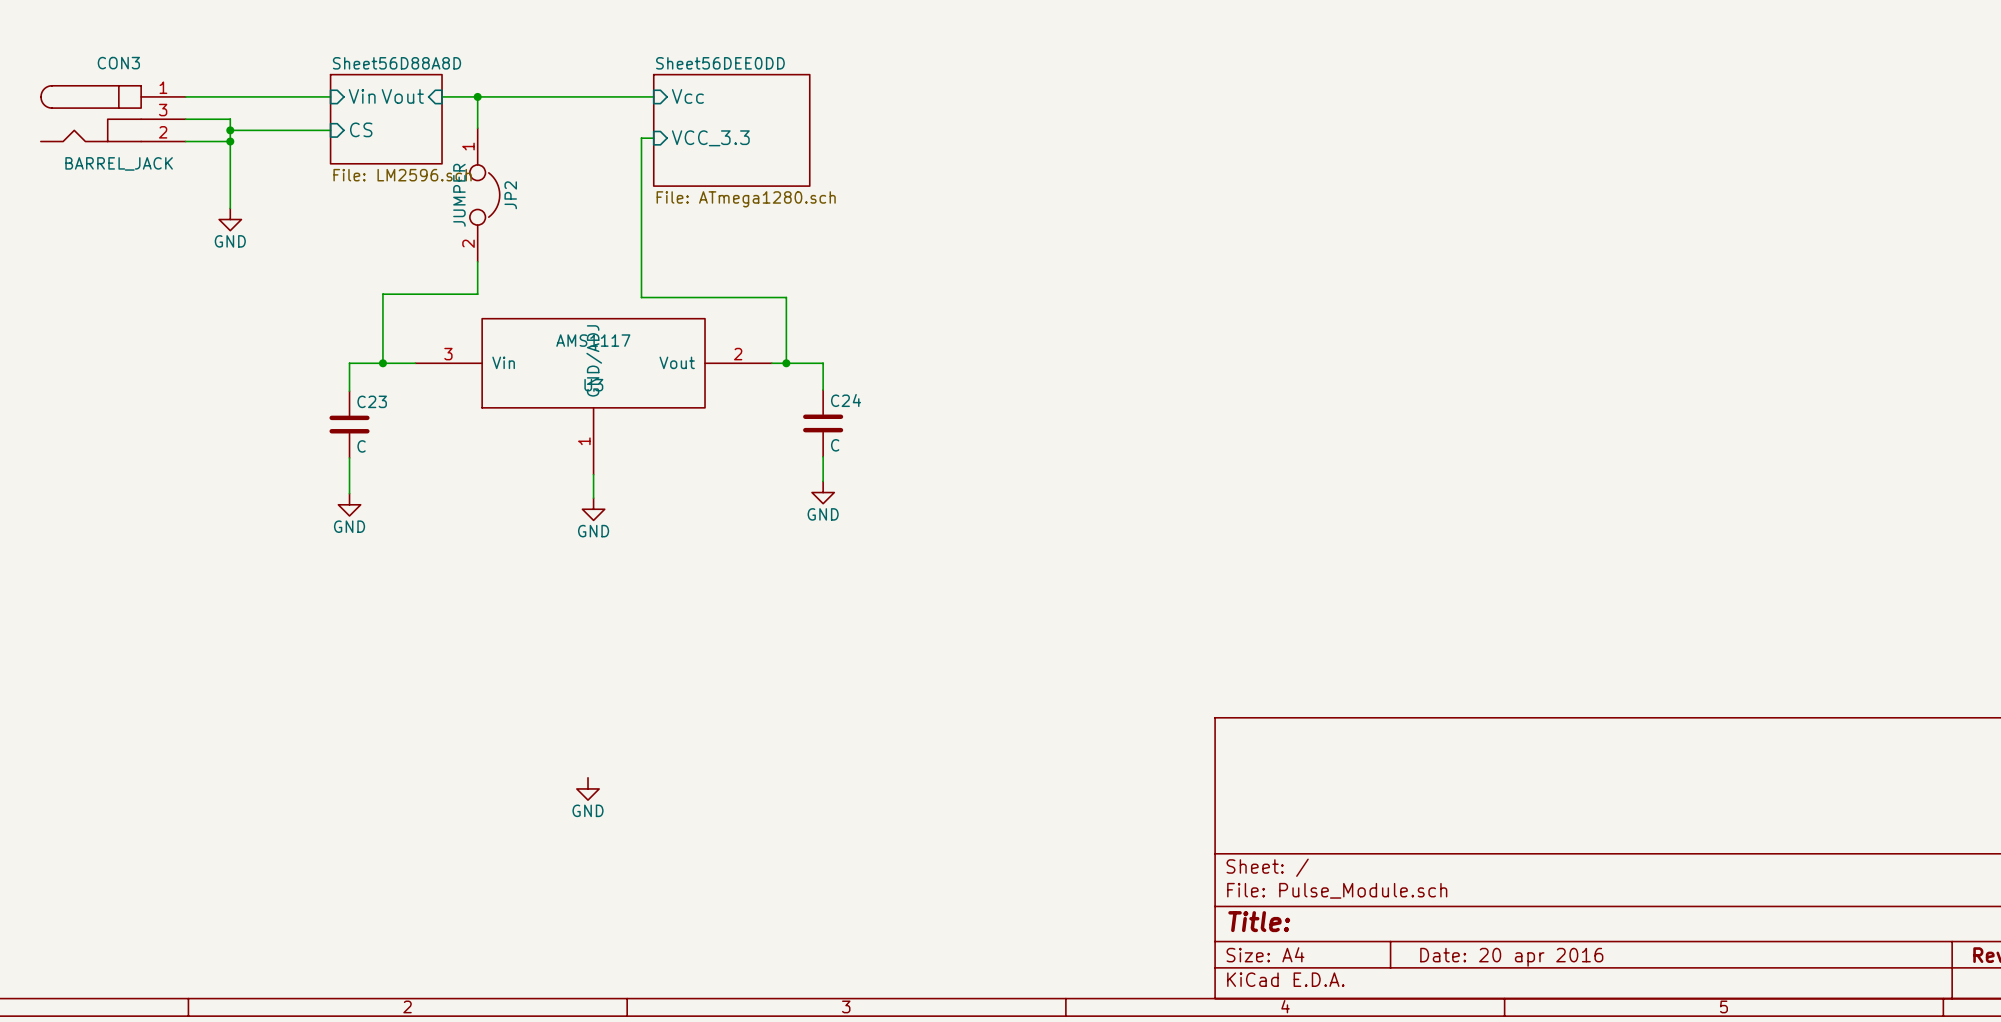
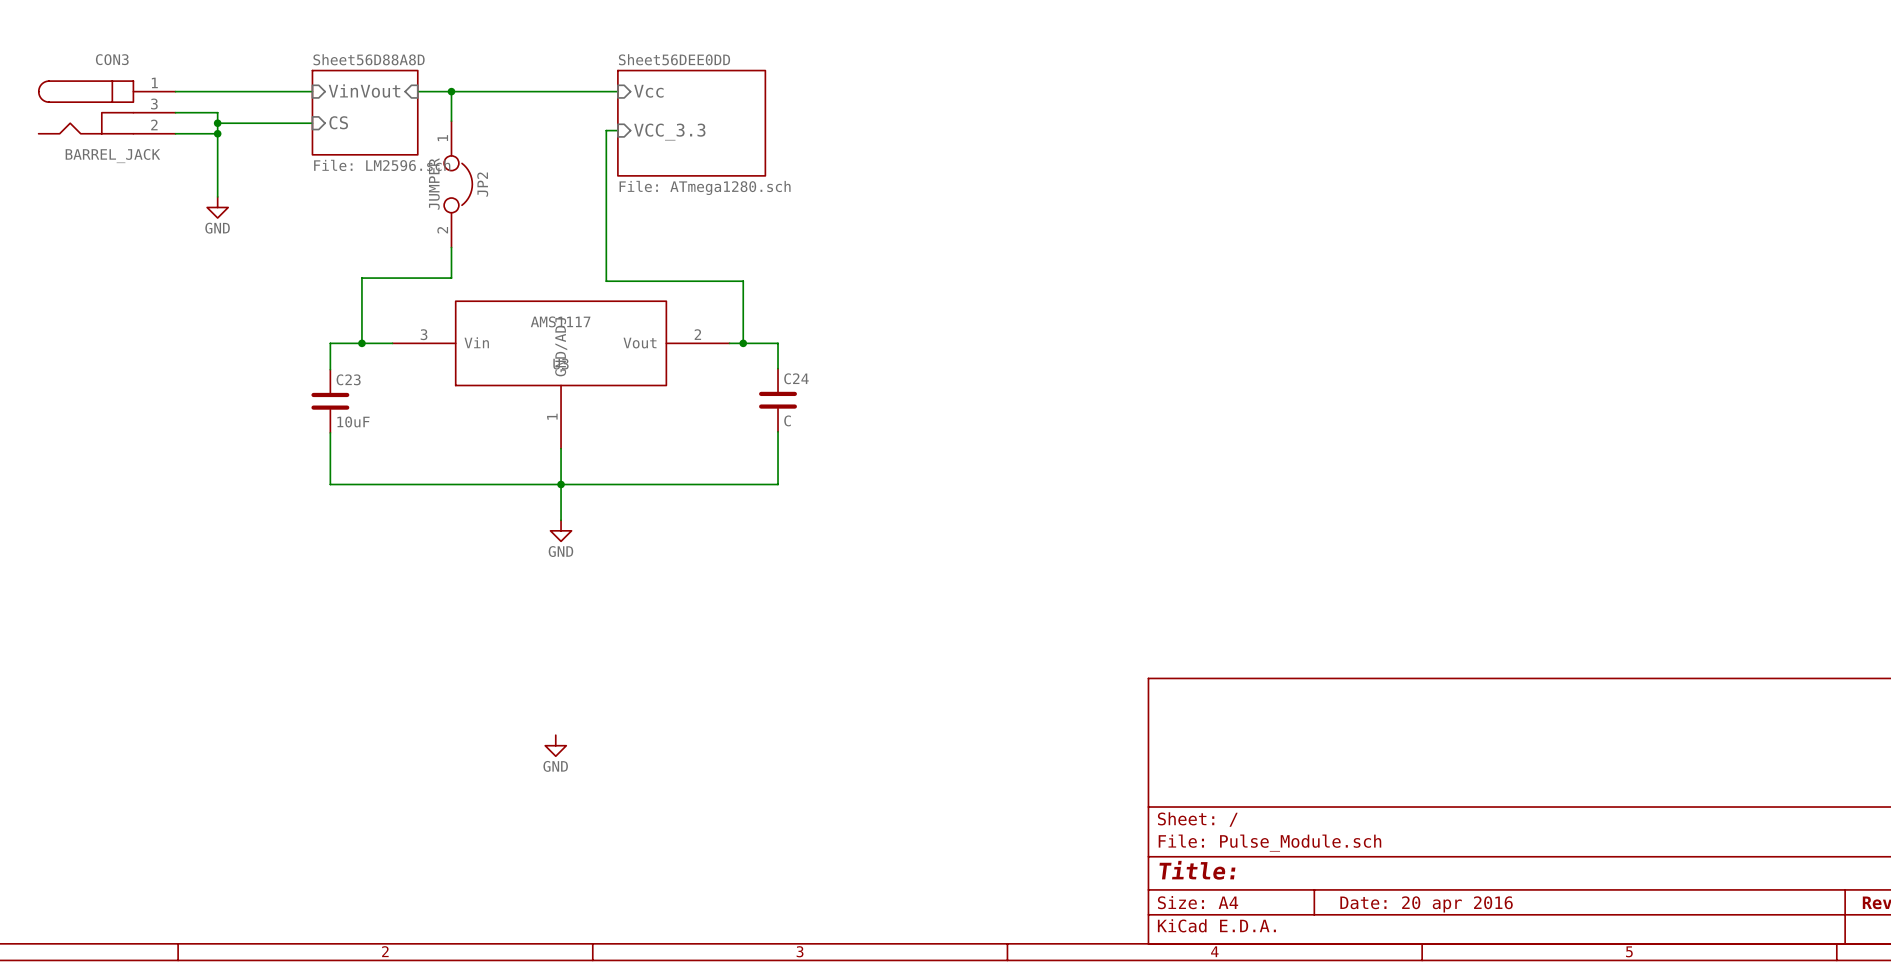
C23 value: C (361, 446) -> 10uF (353, 421)
wire: none -> (778, 455) (778, 484) (330, 484) (330, 466)
power symbol: GND (823, 492) -> none
wire: none -> (561, 470) (561, 520)
power symbol: GND (349, 504) -> none
power symbol position: GND (593, 509) -> GND (561, 530)
junction: none -> (561, 484)

